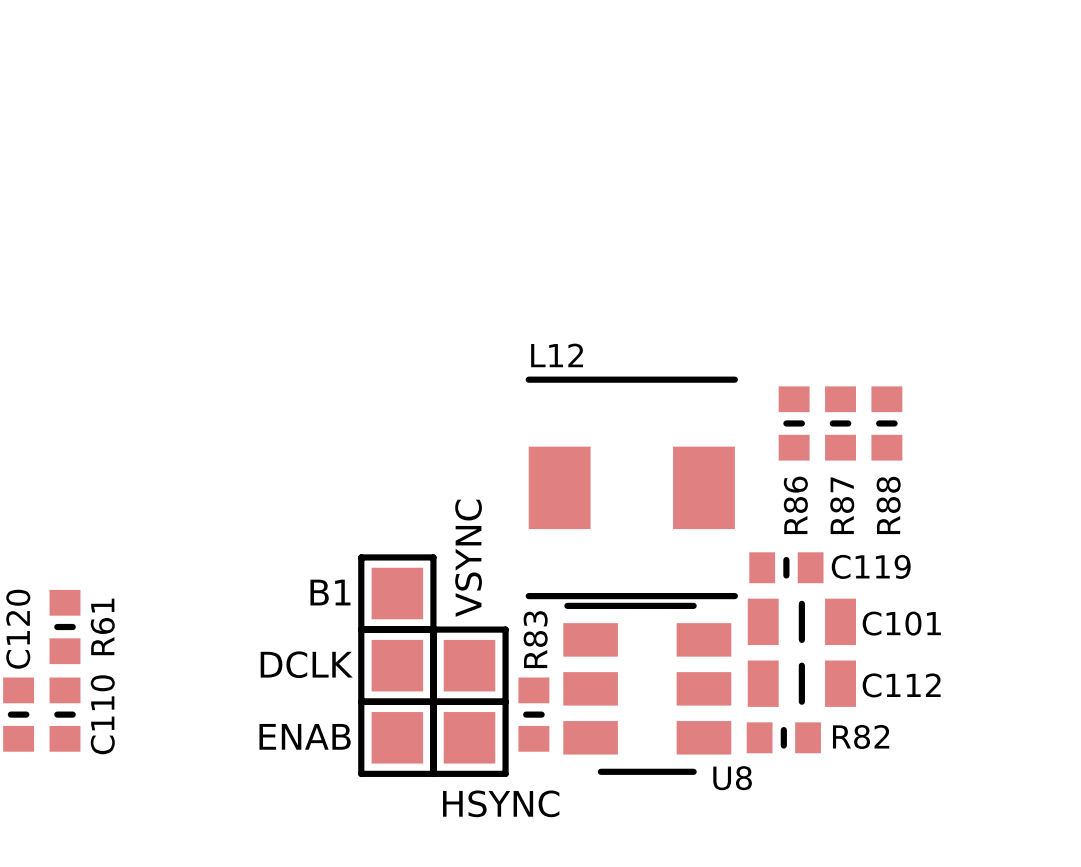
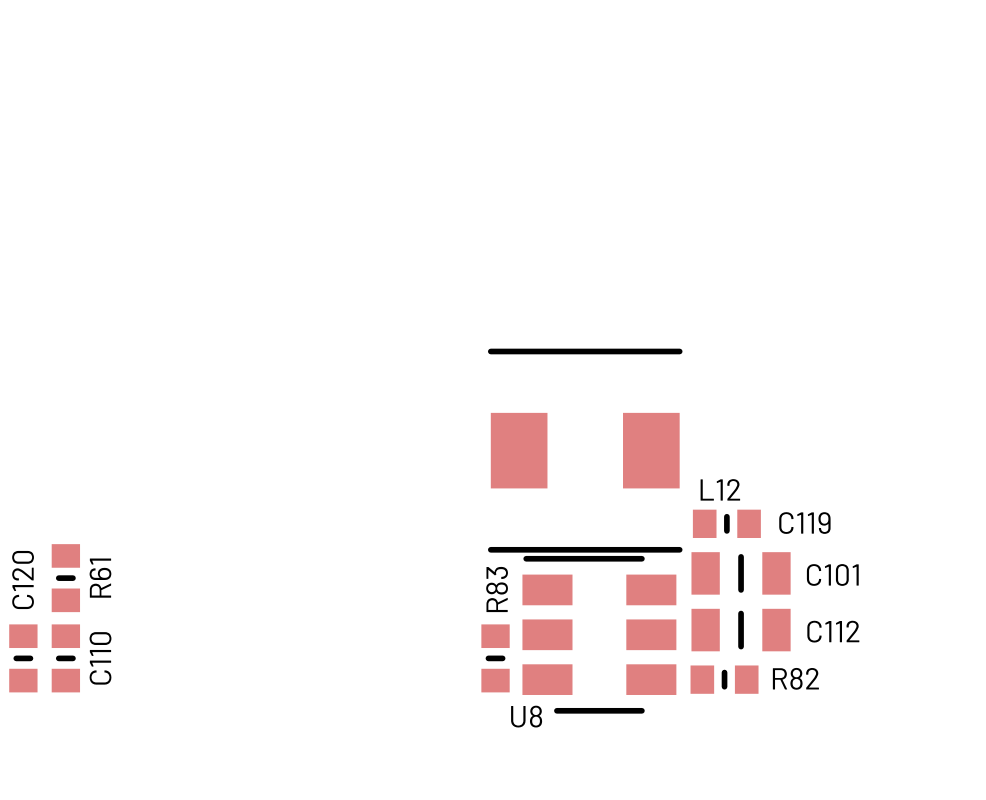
L12 name position: L12 (557, 355) -> L12 (720, 489)
R86: (794, 423) -> none
R87: (840, 423) -> none
R88: (886, 423) -> none
B1: (397, 593) -> none
DCLK: (397, 665) -> none
VSYNC: (469, 665) -> none
ENAB: (397, 737) -> none
HSYNC: (469, 737) -> none
U8 name position: U8 (732, 778) -> U8 (526, 716)

